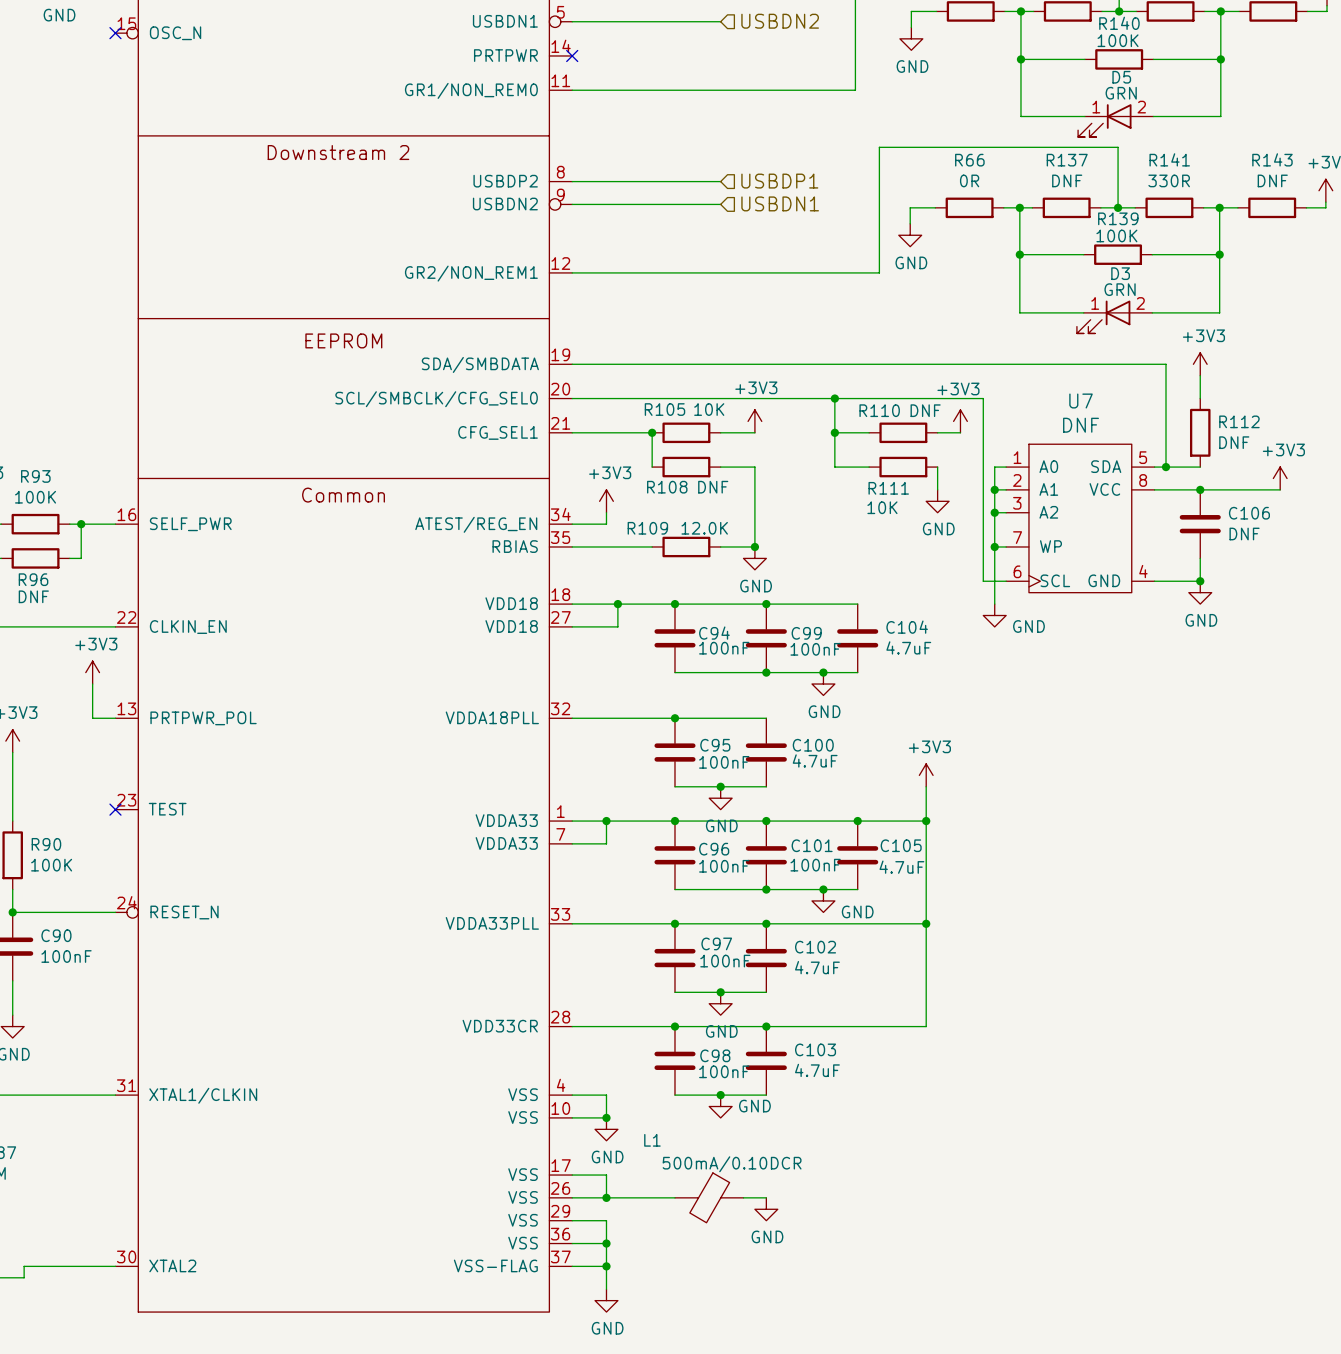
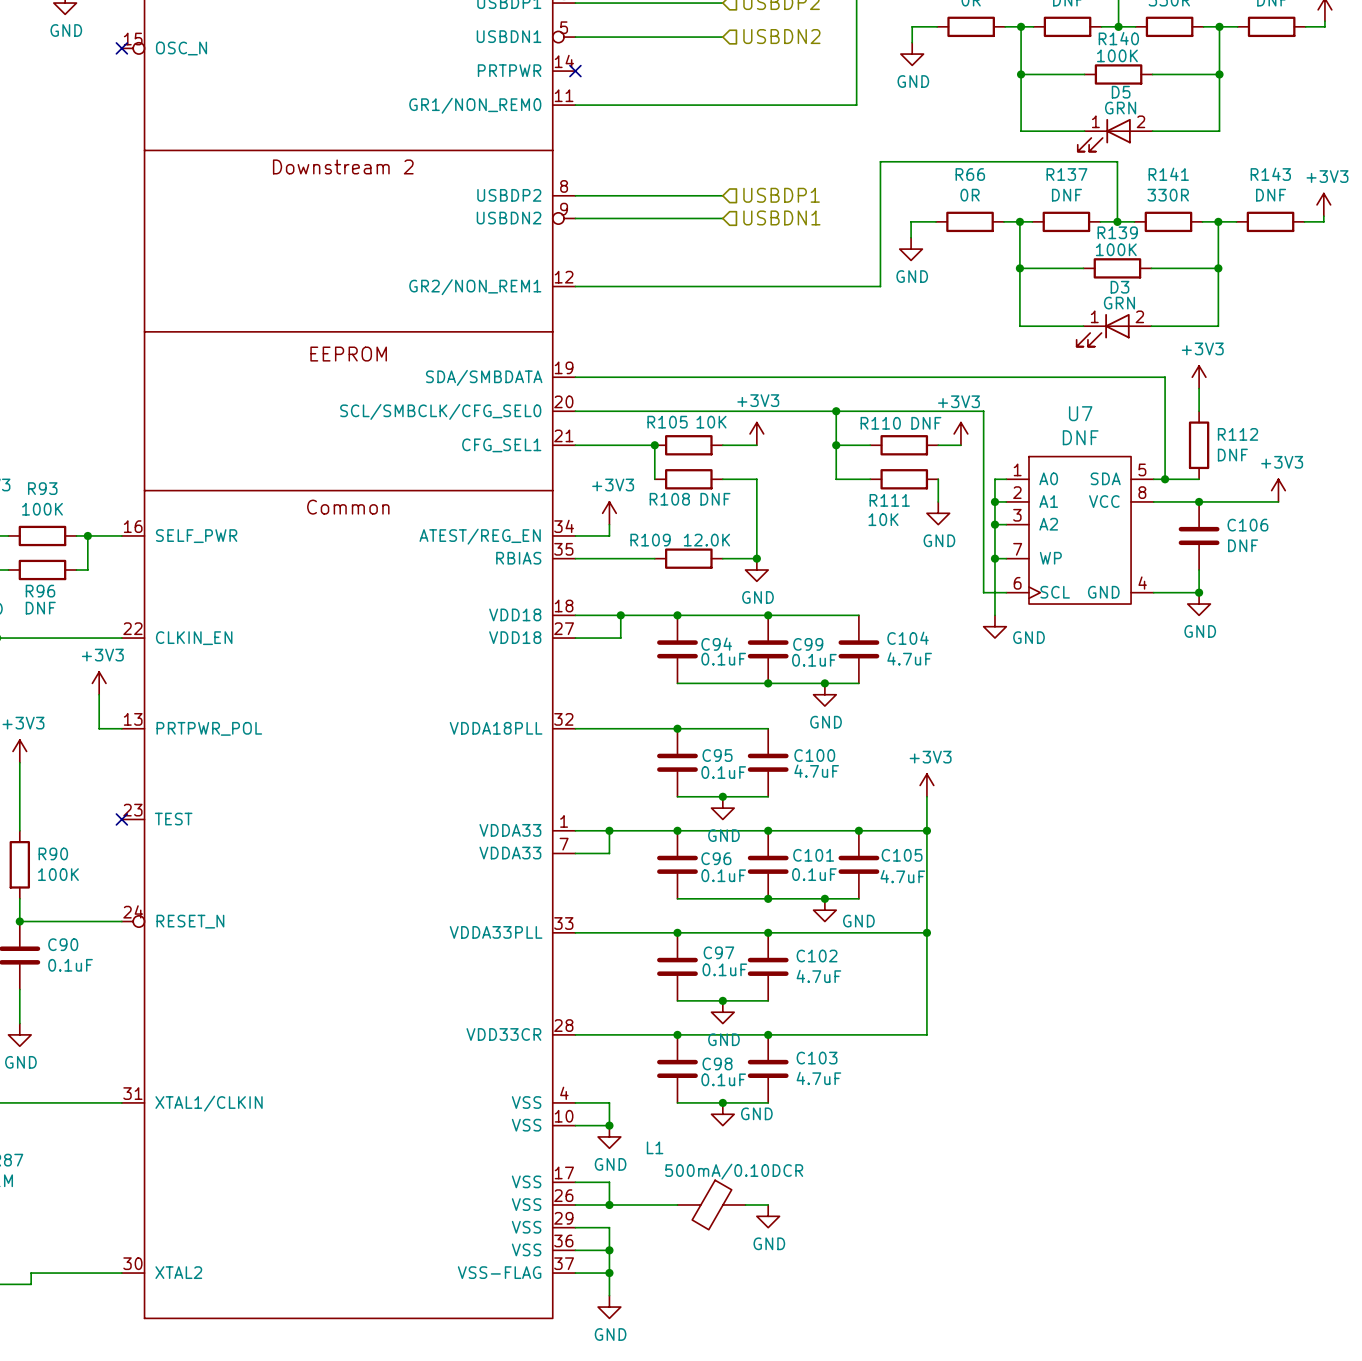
C94 value: 100nF (724, 648) -> 0.1uF (723, 659)
C99 value: 100nF (815, 649) -> 0.1uF (814, 660)
C95 value: 100nF (724, 762) -> 0.1uF (723, 772)
C101 value: 100nF (815, 865) -> 0.1uF (814, 874)
C96 value: 100nF (724, 866) -> 0.1uF (723, 875)
C90 value: 100nF (66, 956) -> 0.1uF (70, 965)
C97 value: 100nF (725, 961) -> 0.1uF (724, 969)
C98 value: 100nF (724, 1071) -> 0.1uF (723, 1079)

